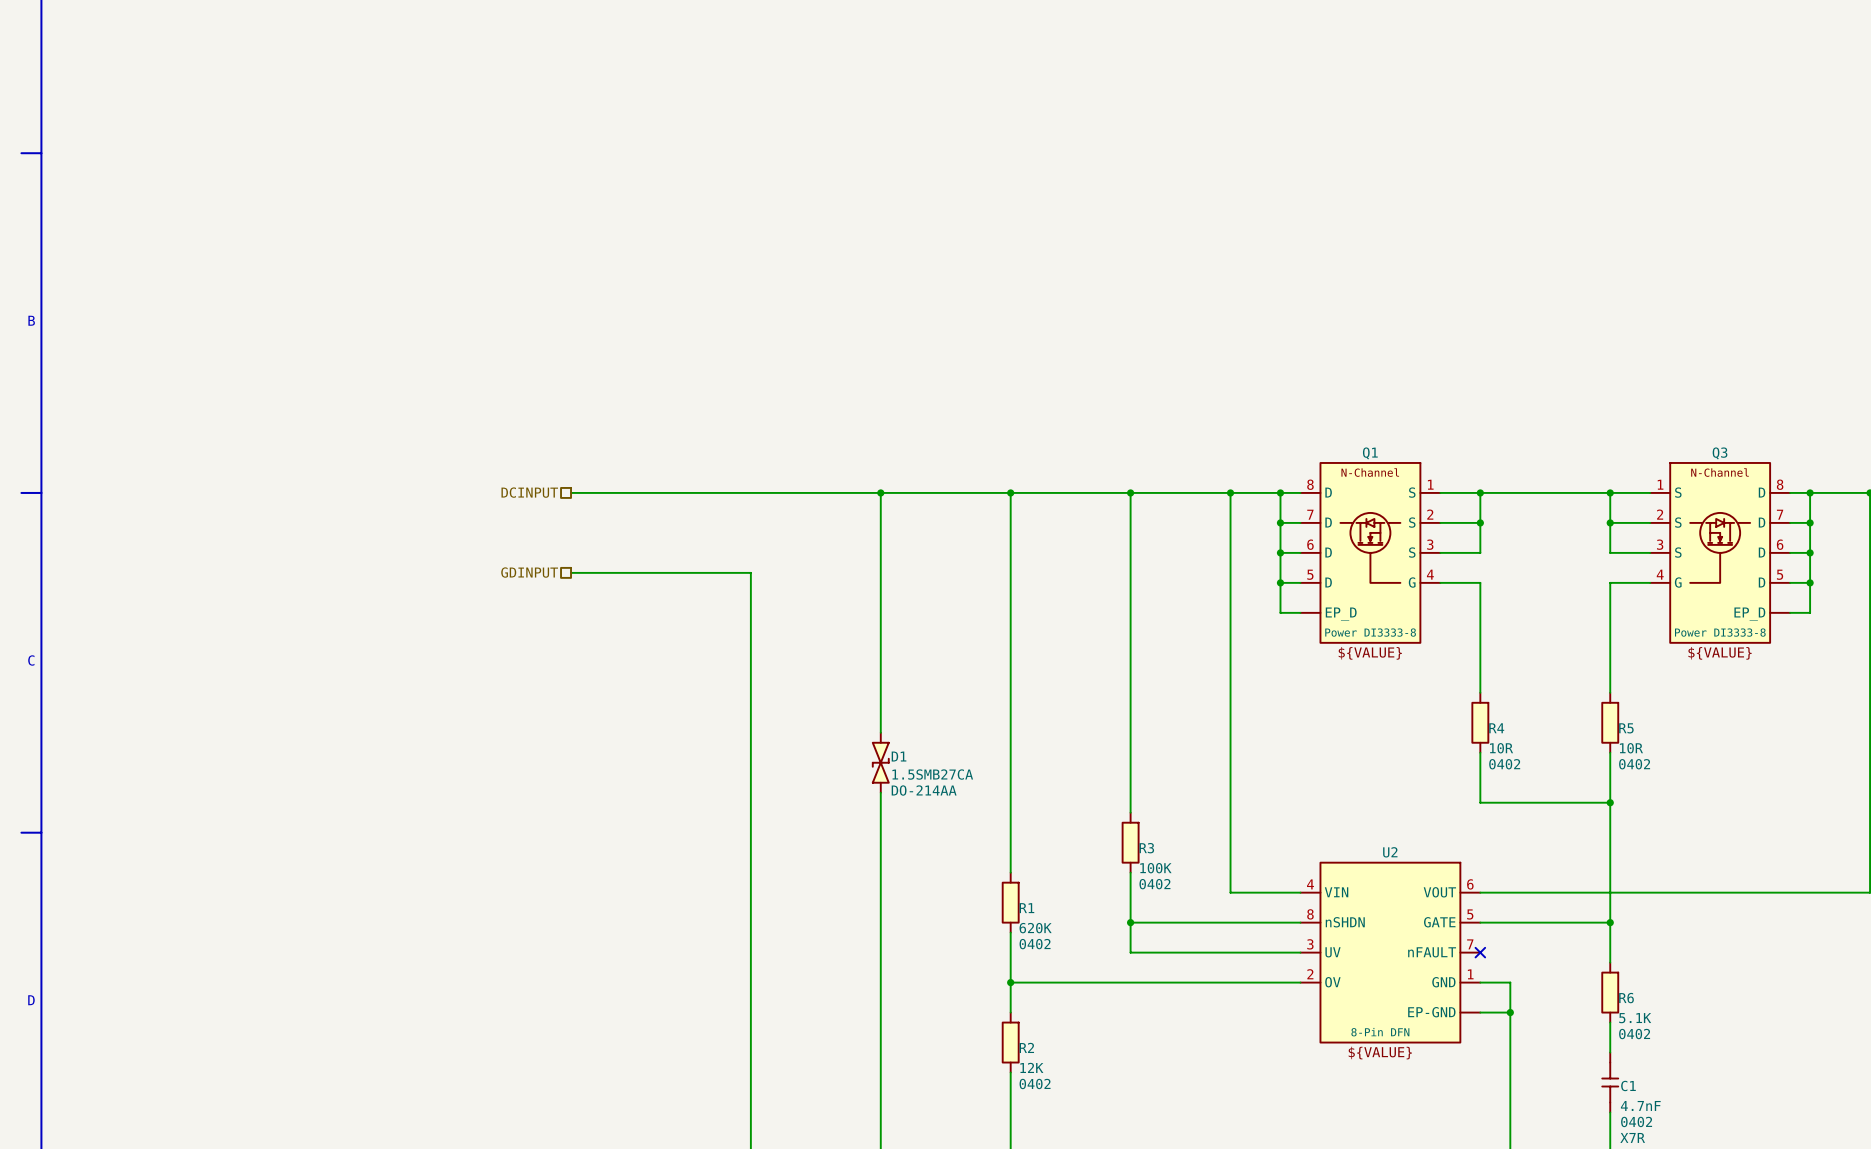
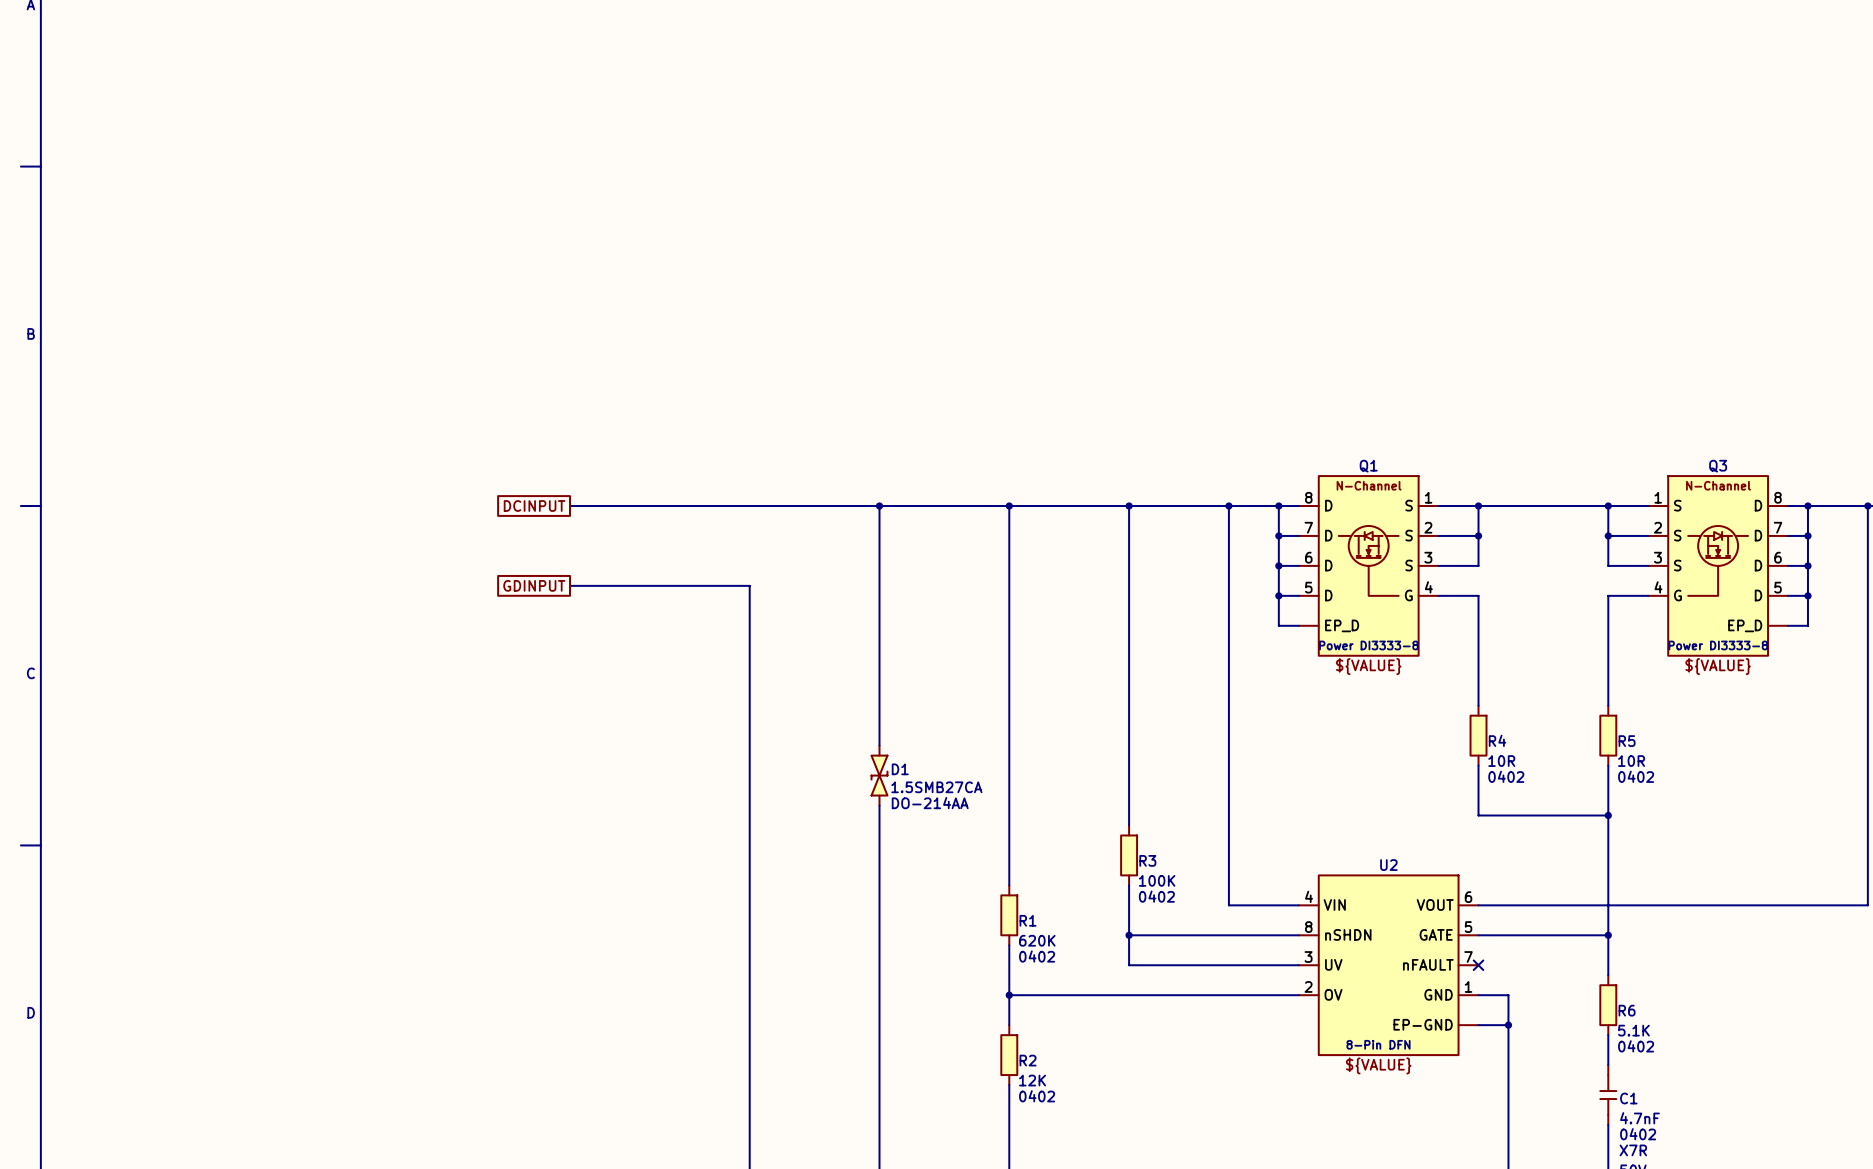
hierarchical label: DCINPUT (529, 492) -> none
global label: none -> DCINPUT (534, 506)
hierarchical label: GDINPUT (529, 572) -> none
global label: none -> GDINPUT (534, 585)

